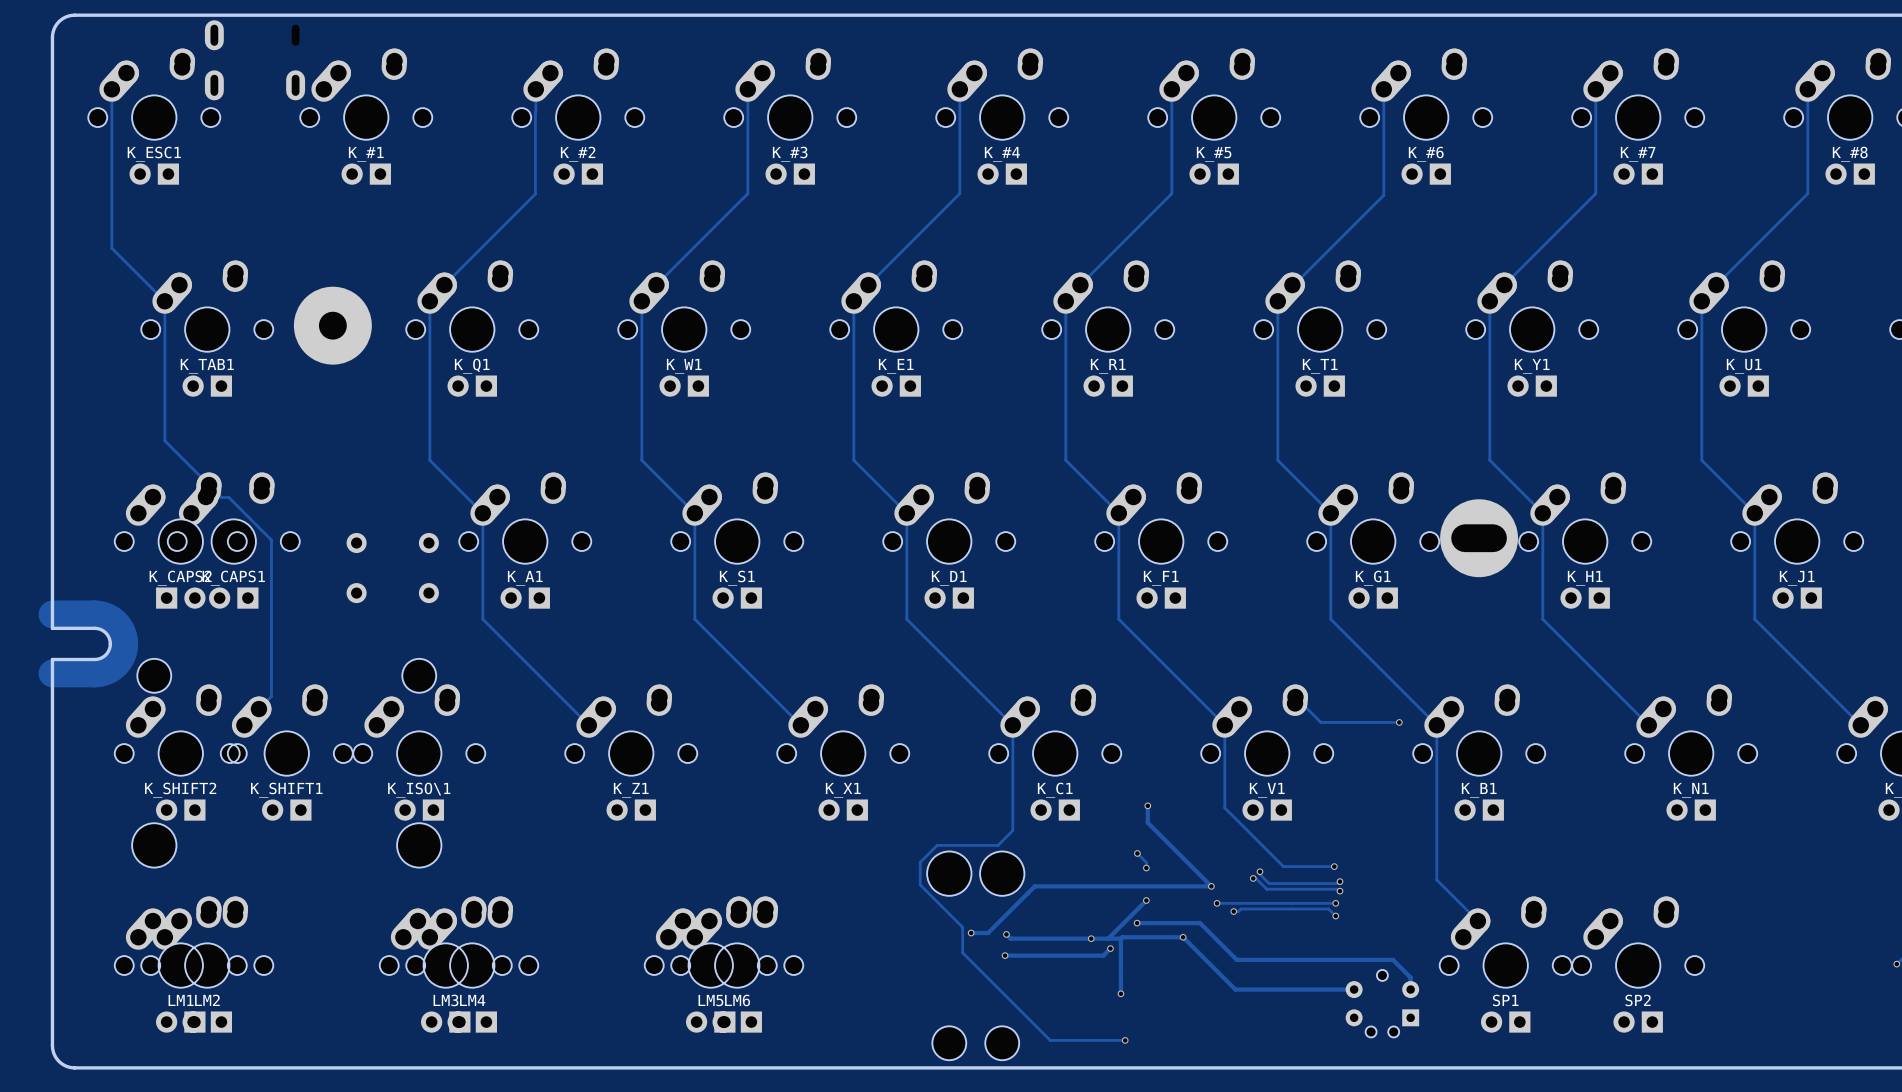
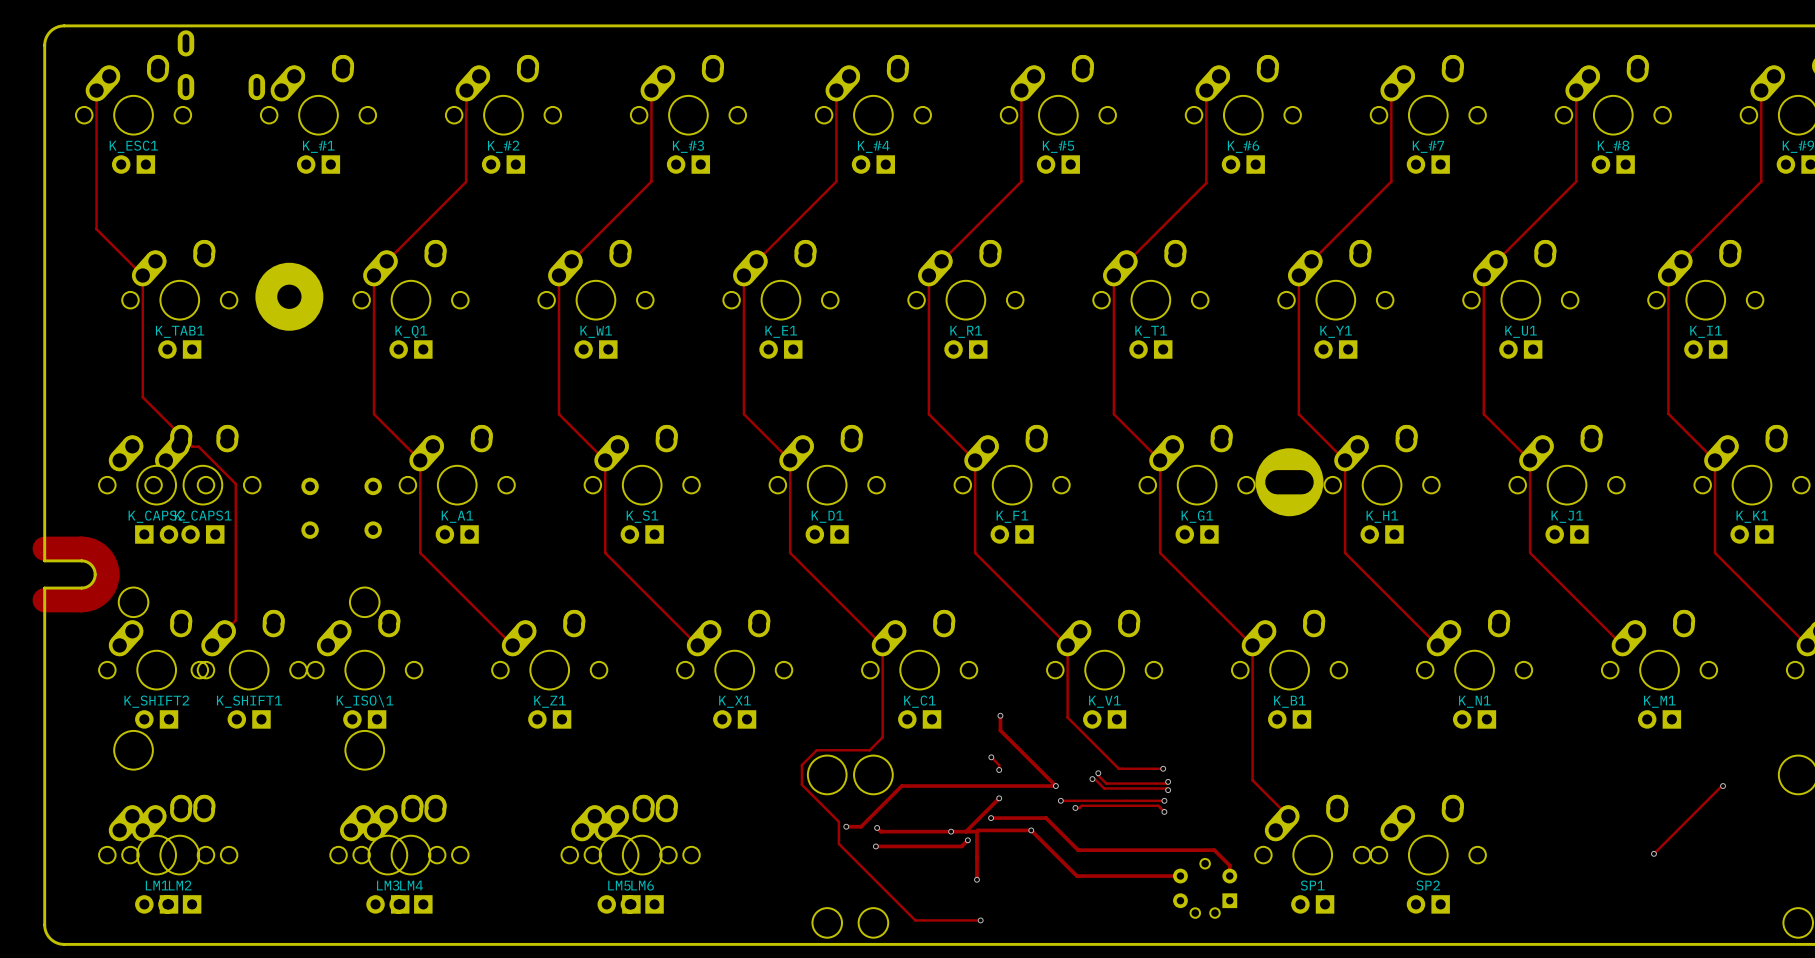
track: (1295, 697) (1320, 722) (1399, 722) -> none
via: (1399, 722) -> none

